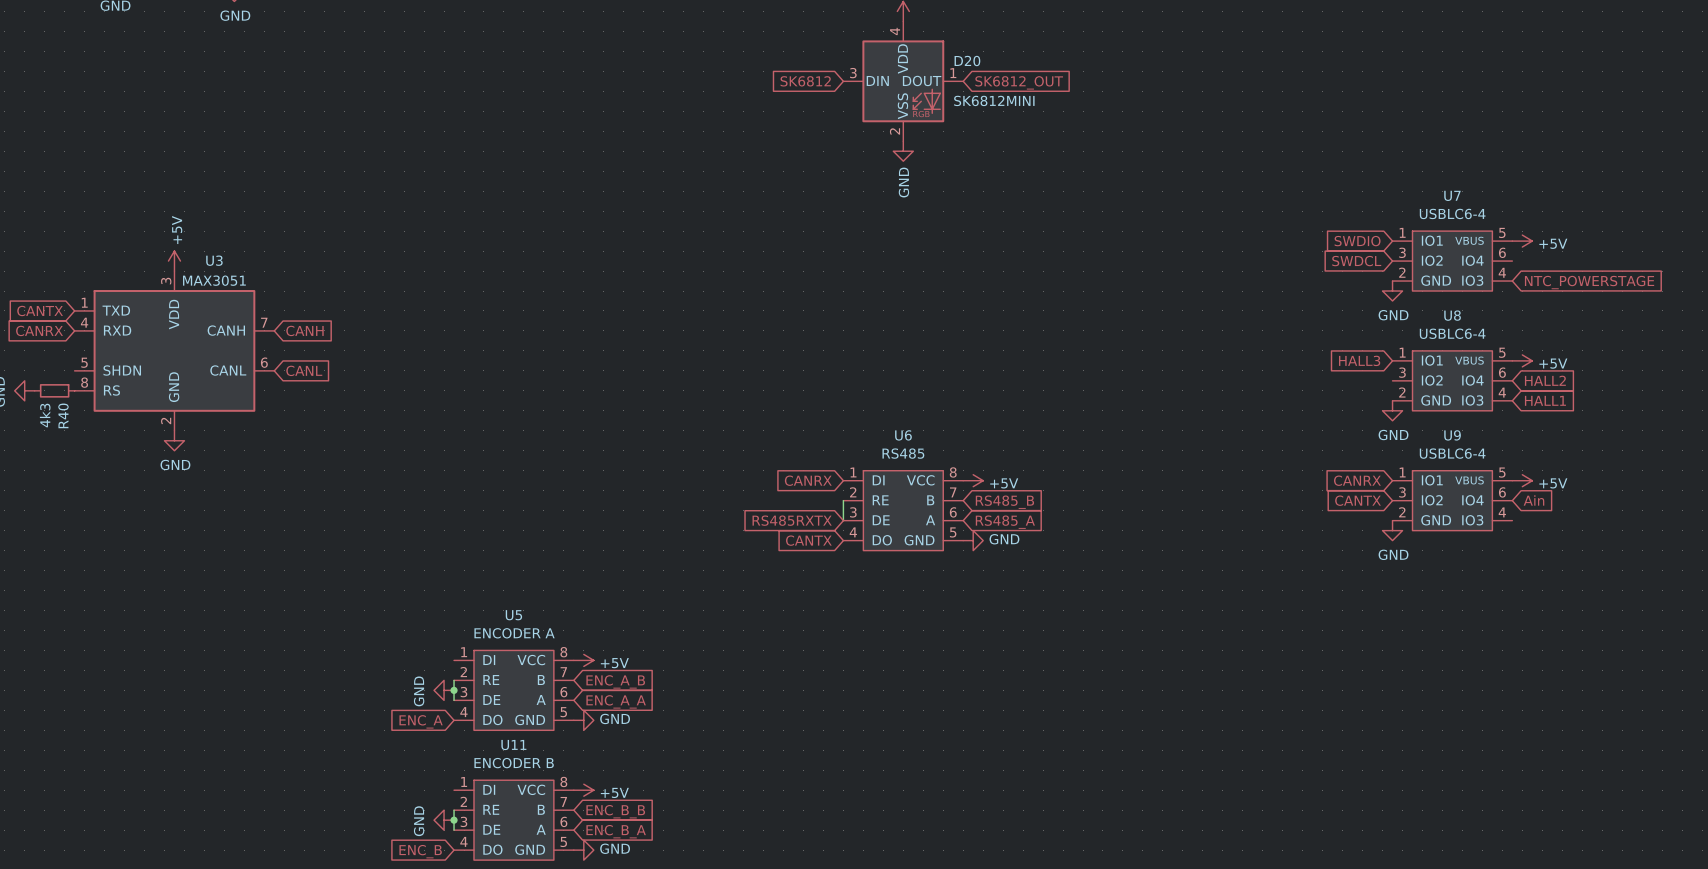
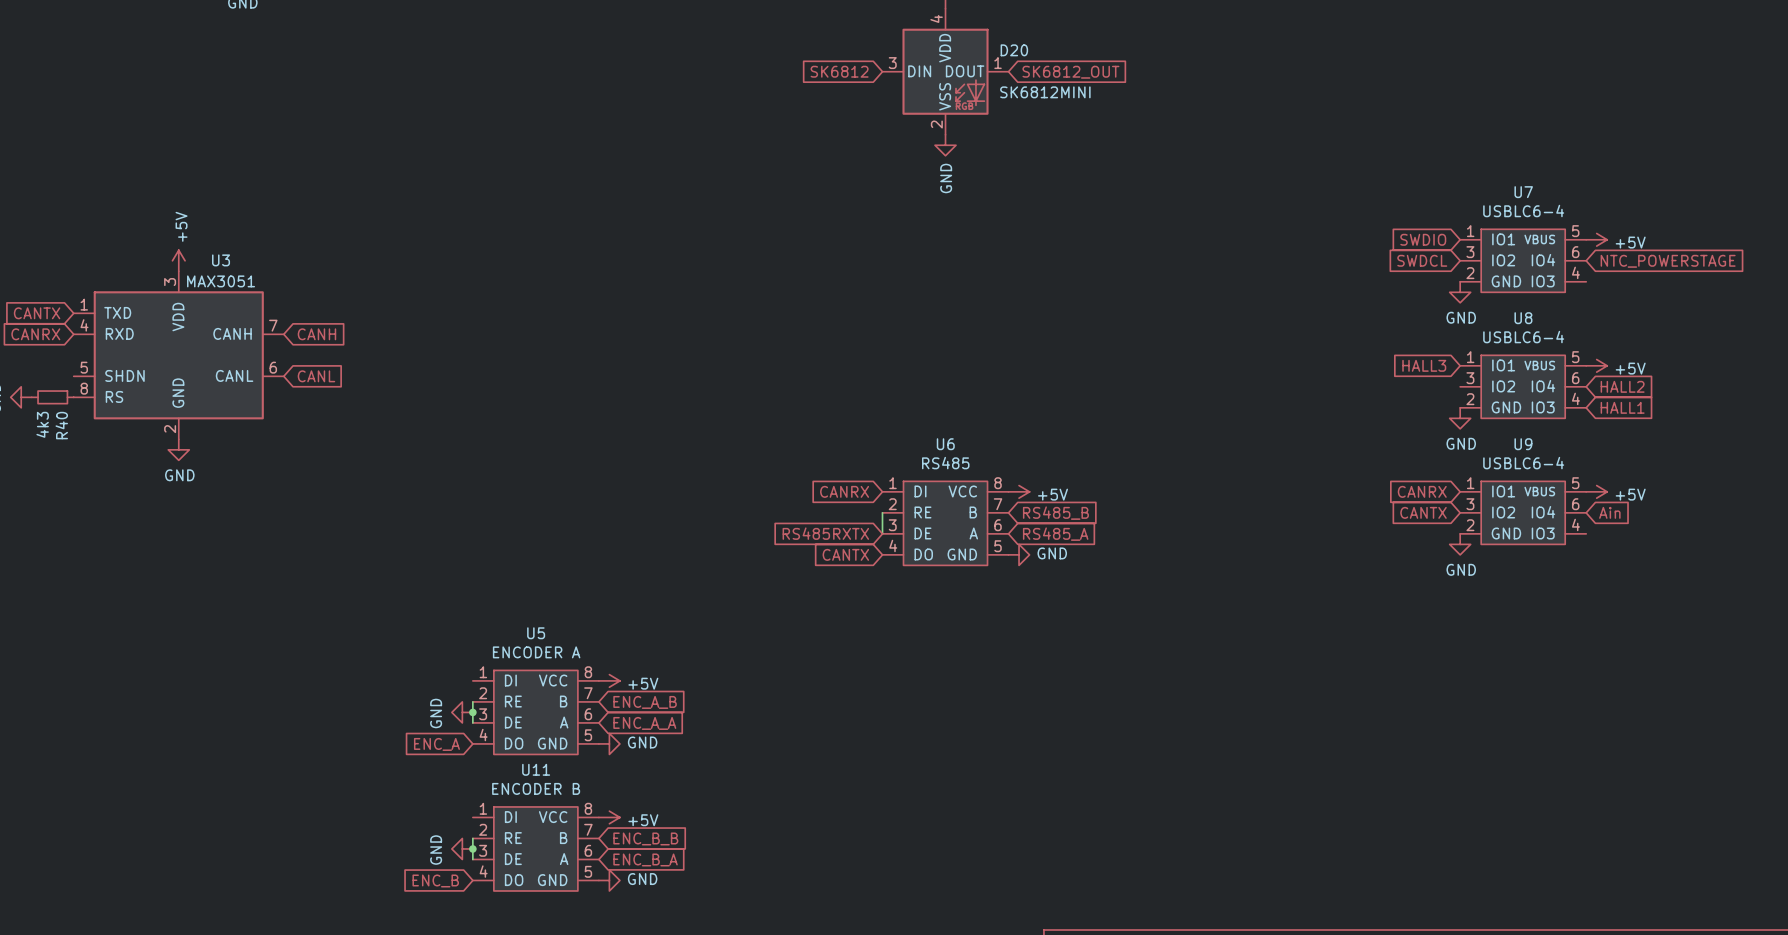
global label position: NTC_POWERSTAGE (1589, 282) -> NTC_POWERSTAGE (1668, 261)

